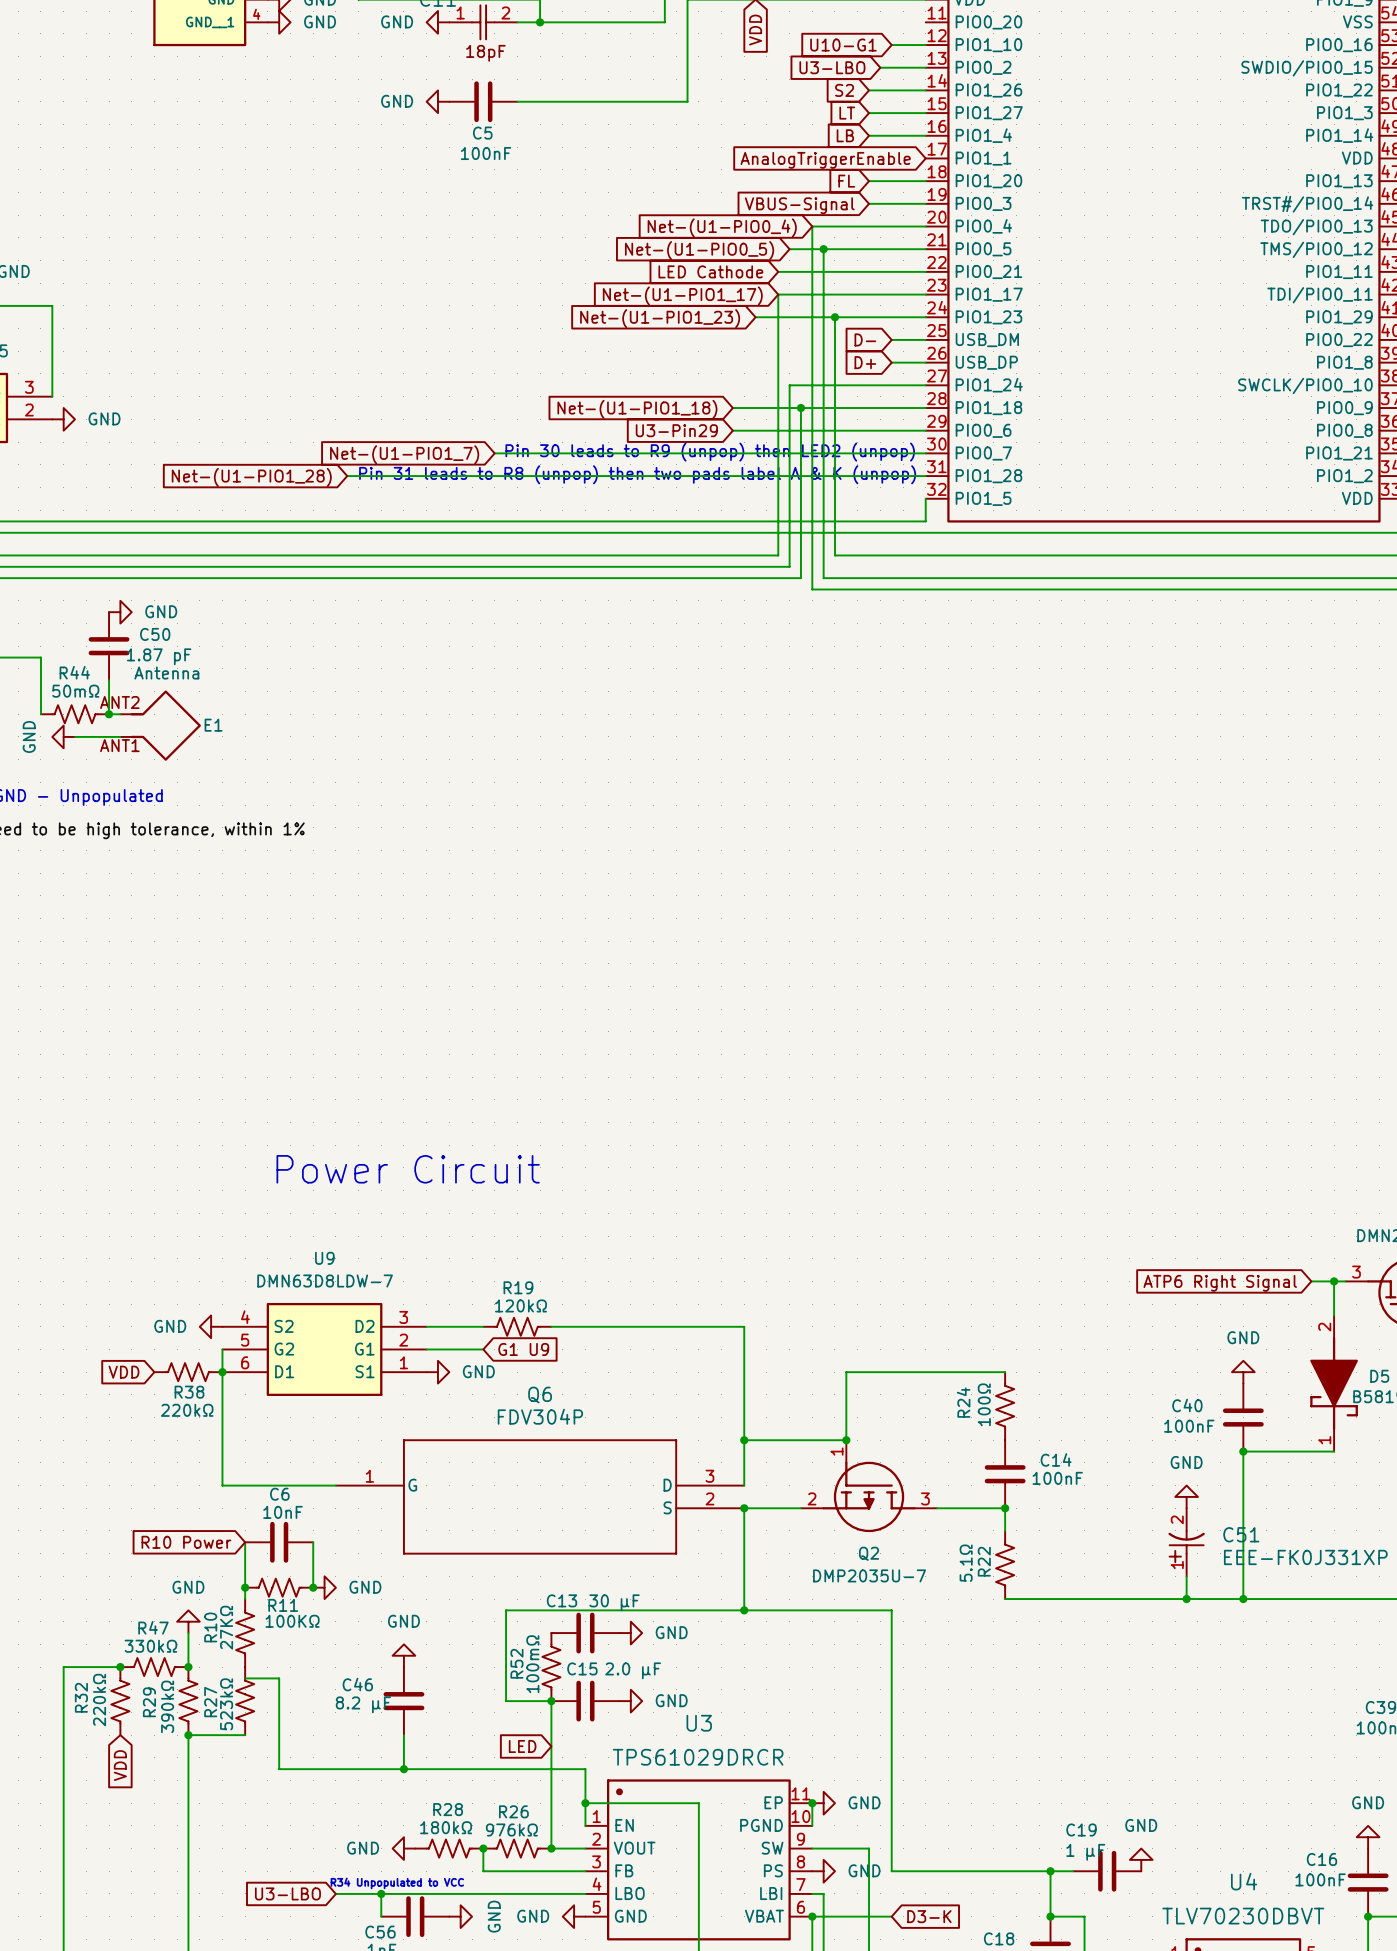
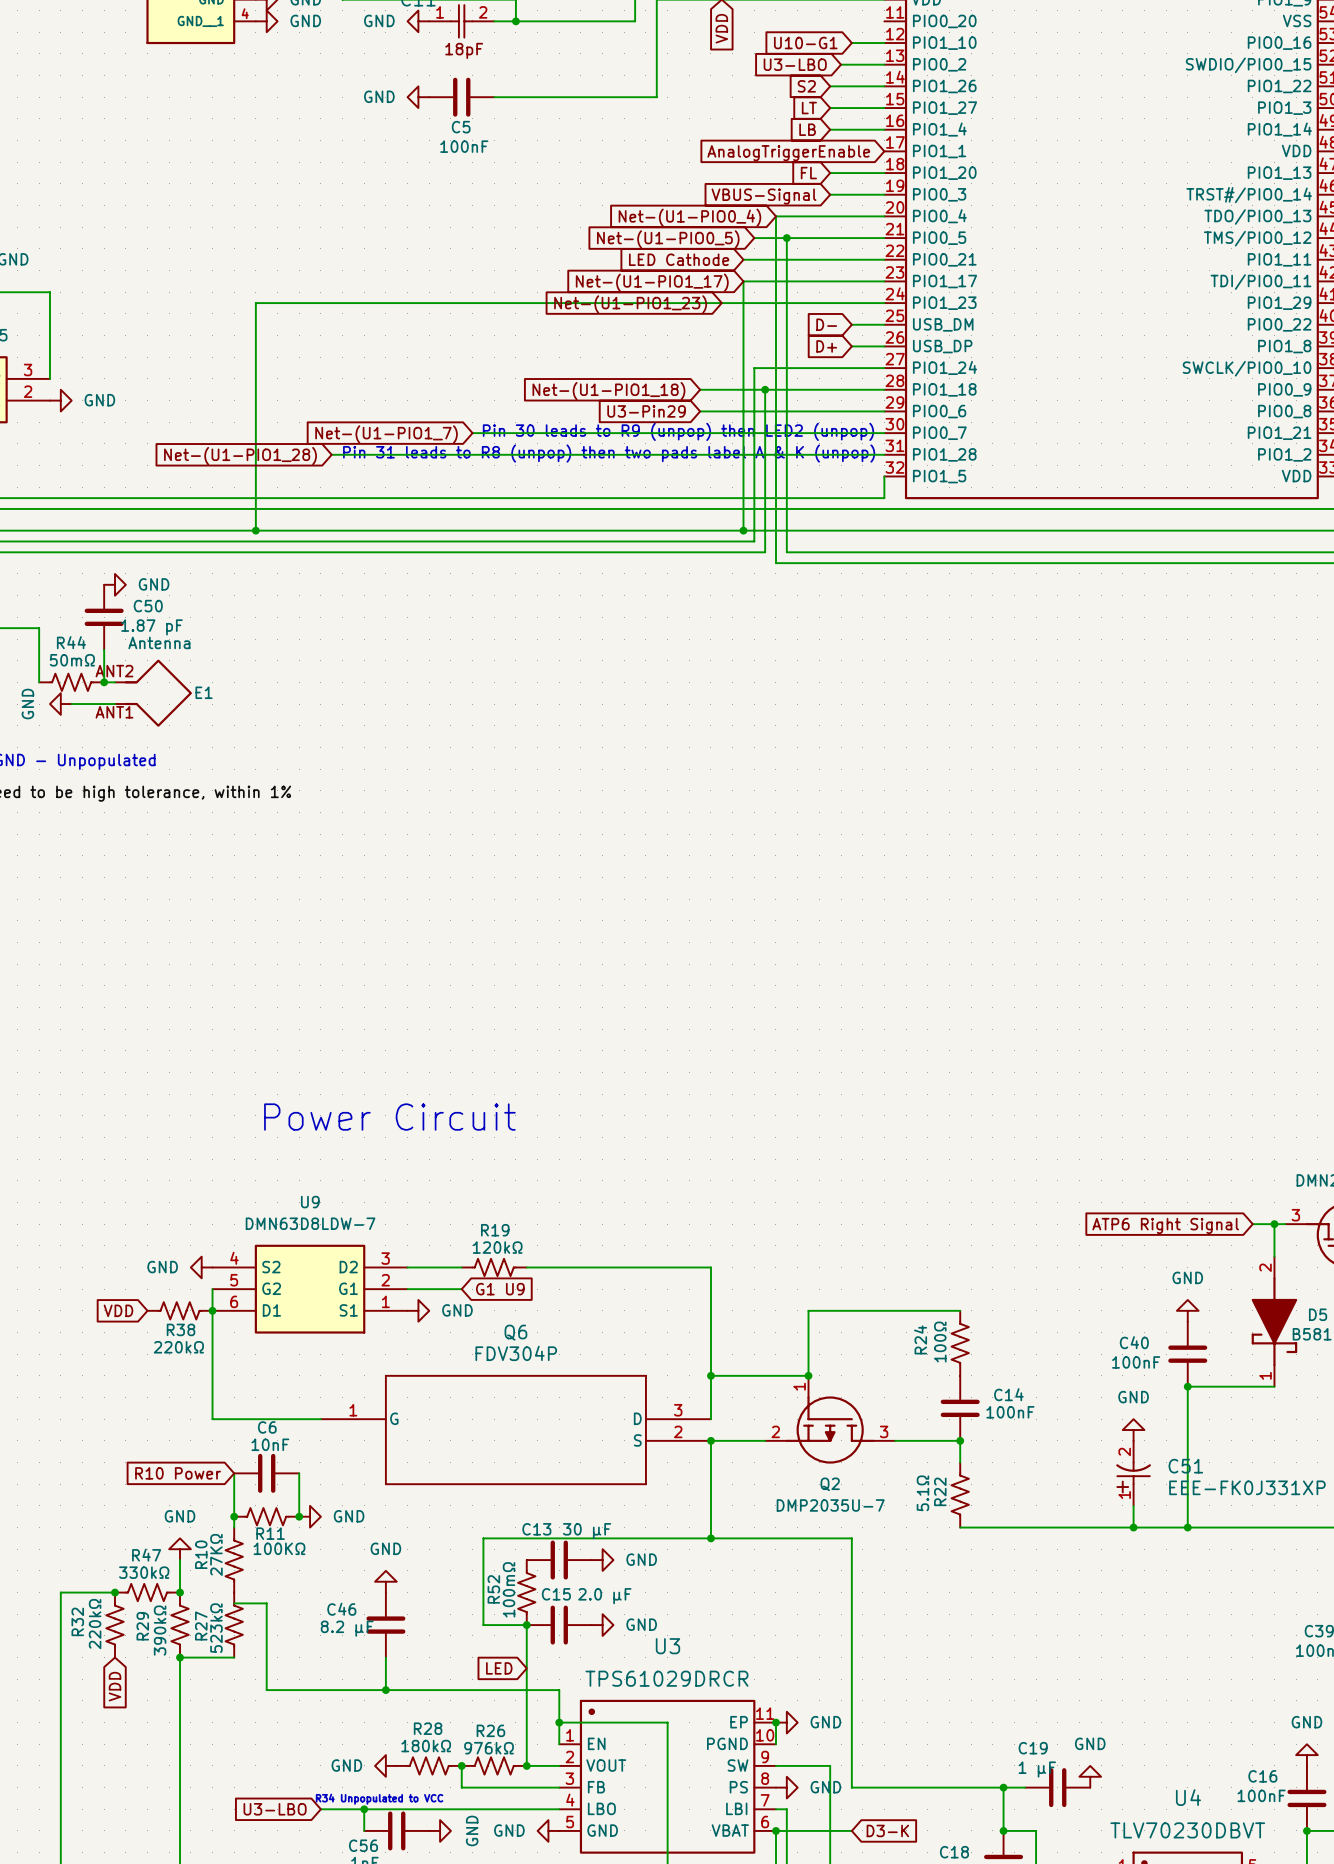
wire: none -> (721, 303) (255, 303) (255, 530)
wire: (834, 317) (834, 555) -> (743, 530) (797, 530)
junction: (834, 317) -> none
junction: none -> (255, 530)
junction: none -> (743, 530)

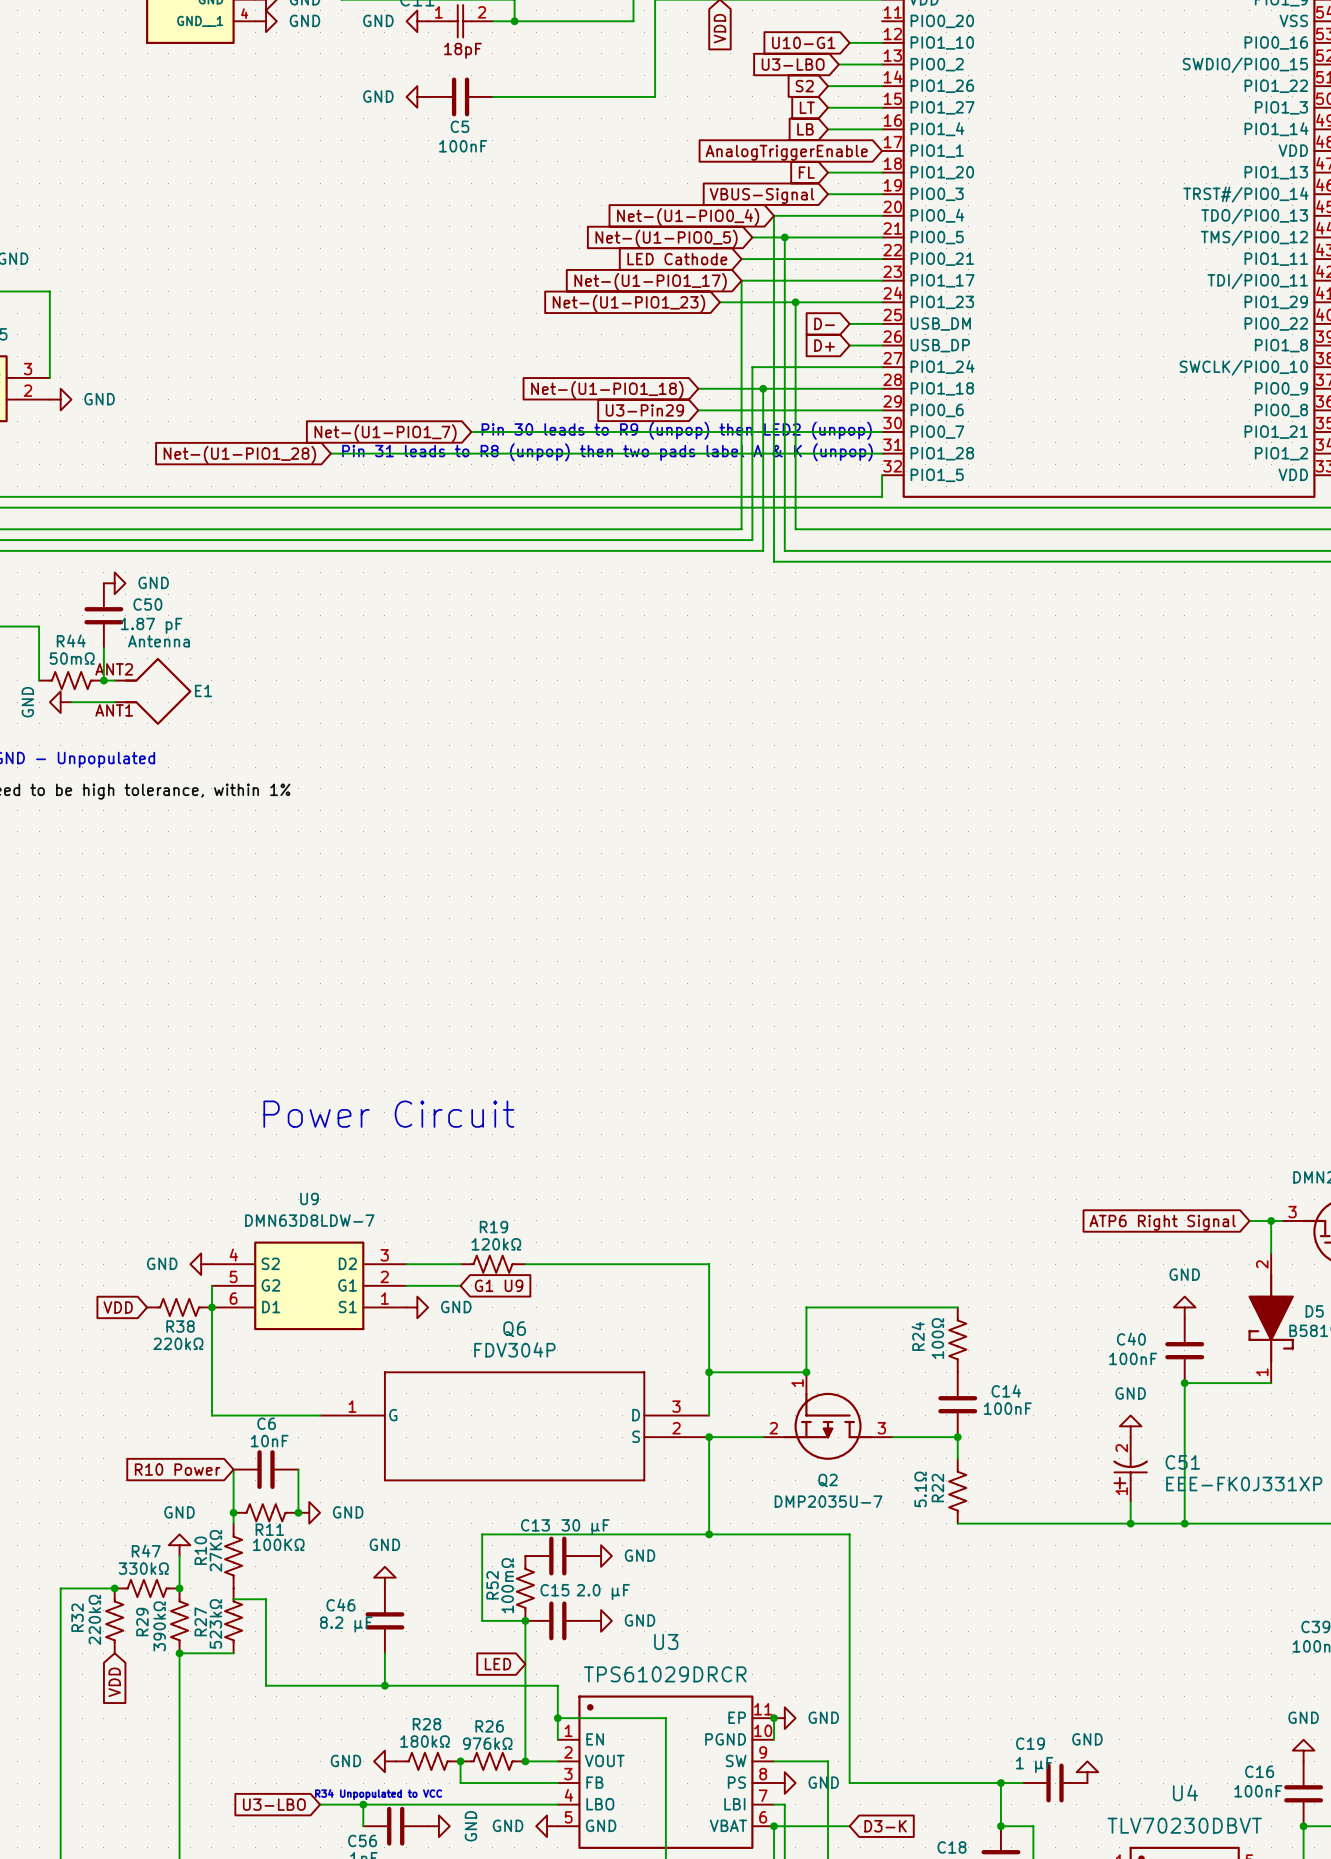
wire: (721, 303) (255, 303) (255, 530) -> none
junction: none -> (795, 302)
junction: (255, 530) -> none
wire: (743, 530) (797, 530) -> (795, 302) (795, 529)
junction: (743, 530) -> none

